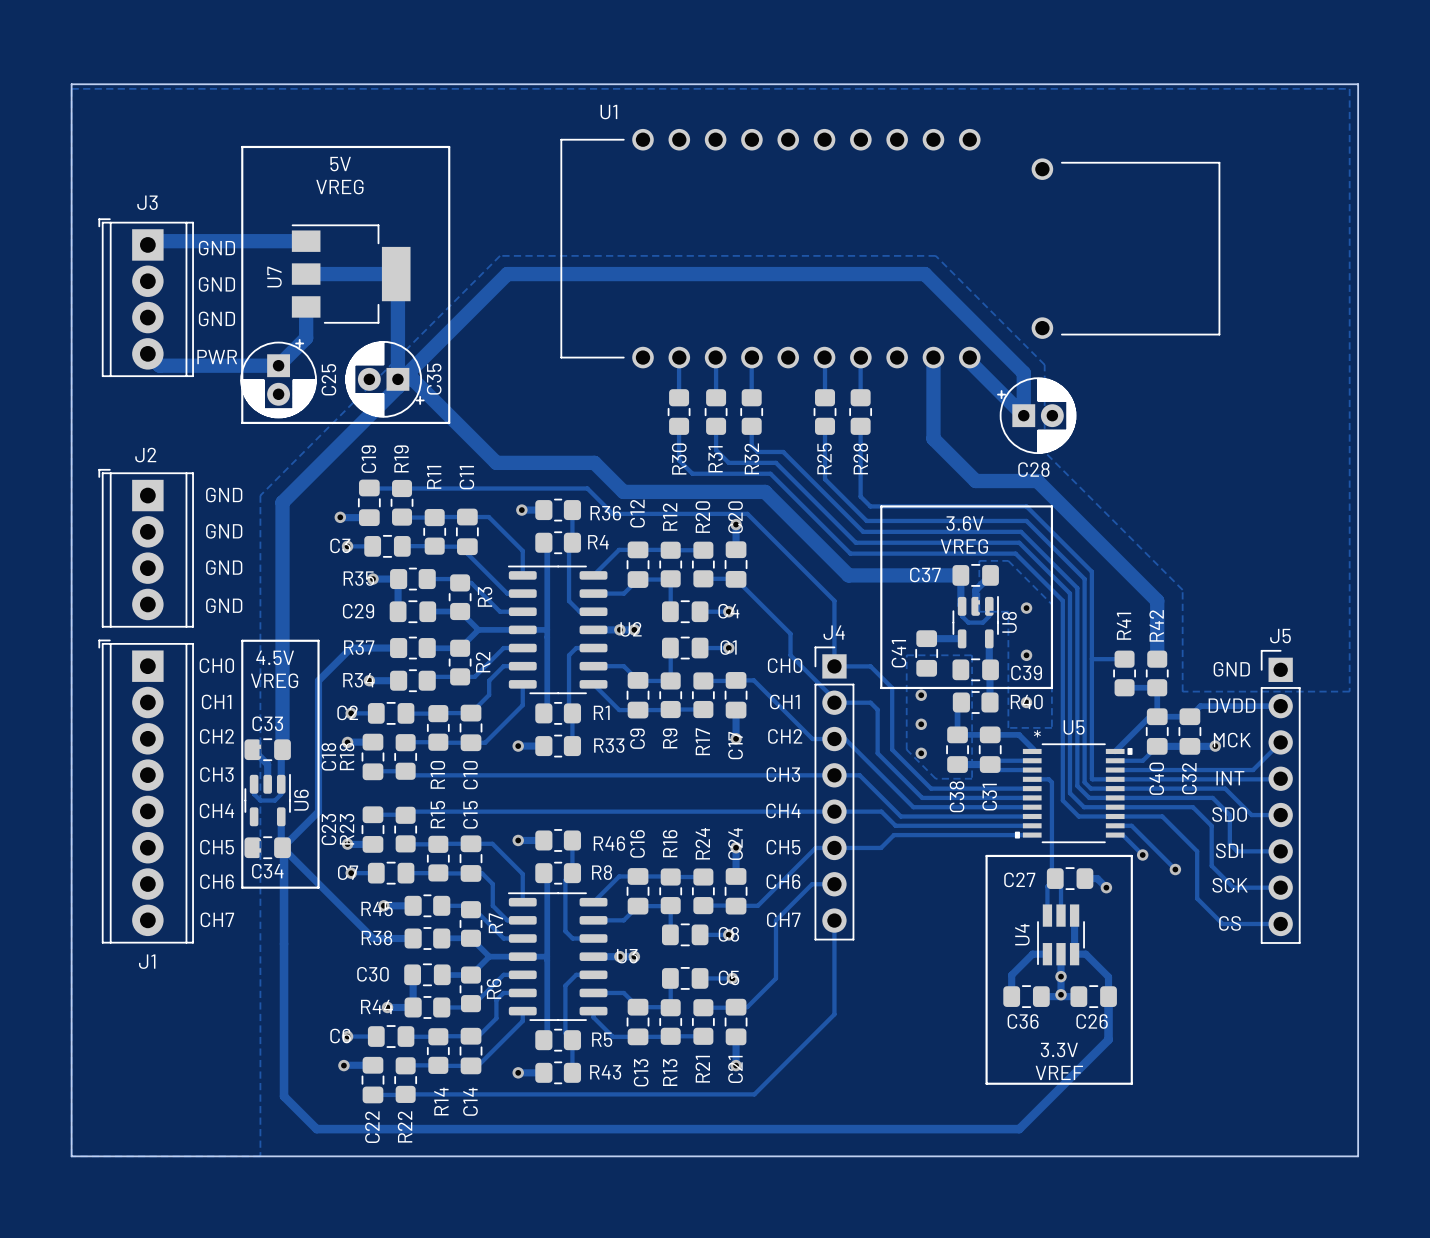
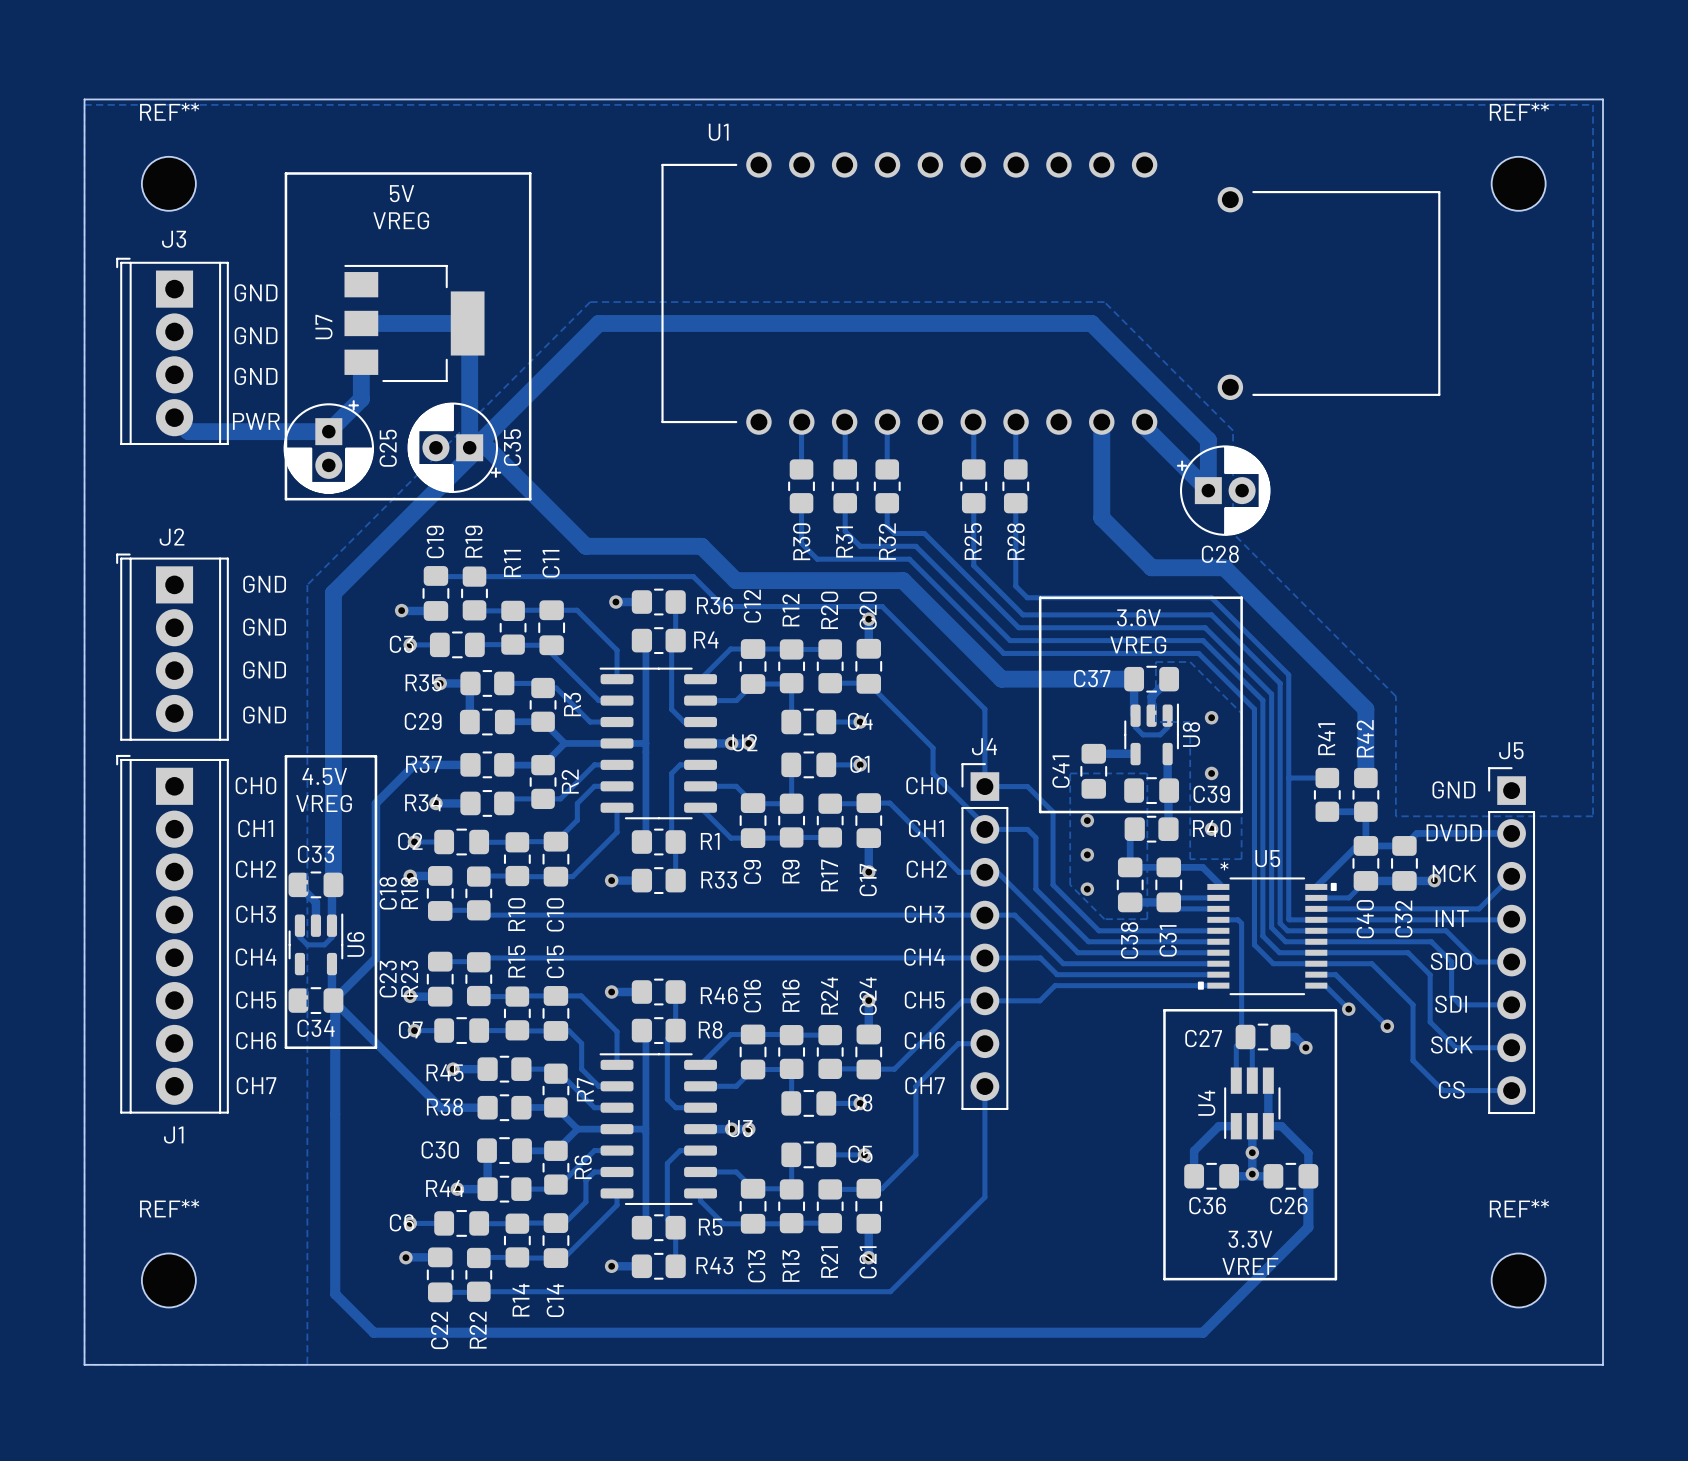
REF**: none -> (168, 183)
REF**: none -> (1518, 183)
track: (306, 241) (151, 241) (147, 244) -> none
REF**: none -> (168, 1280)
REF**: none -> (1518, 1280)

